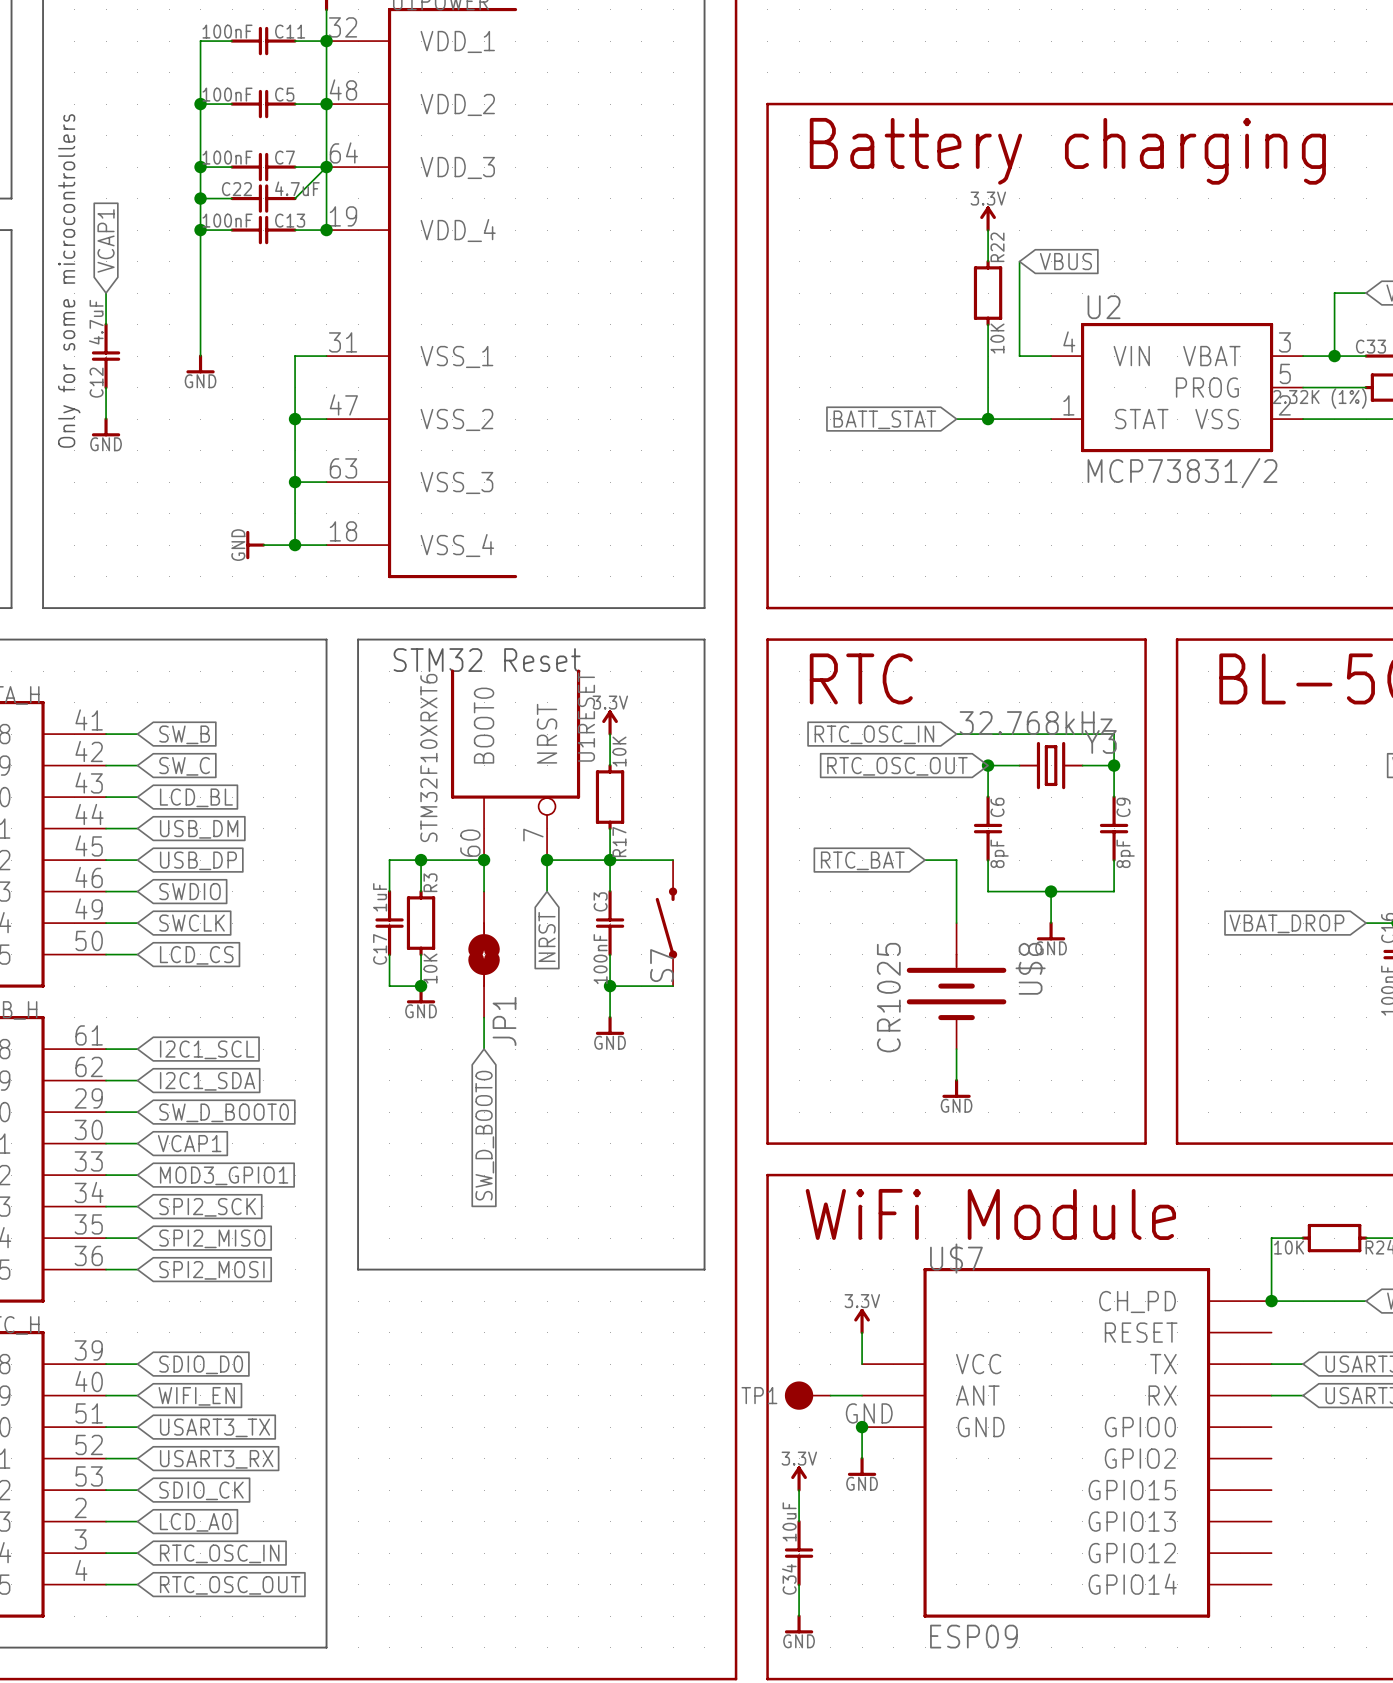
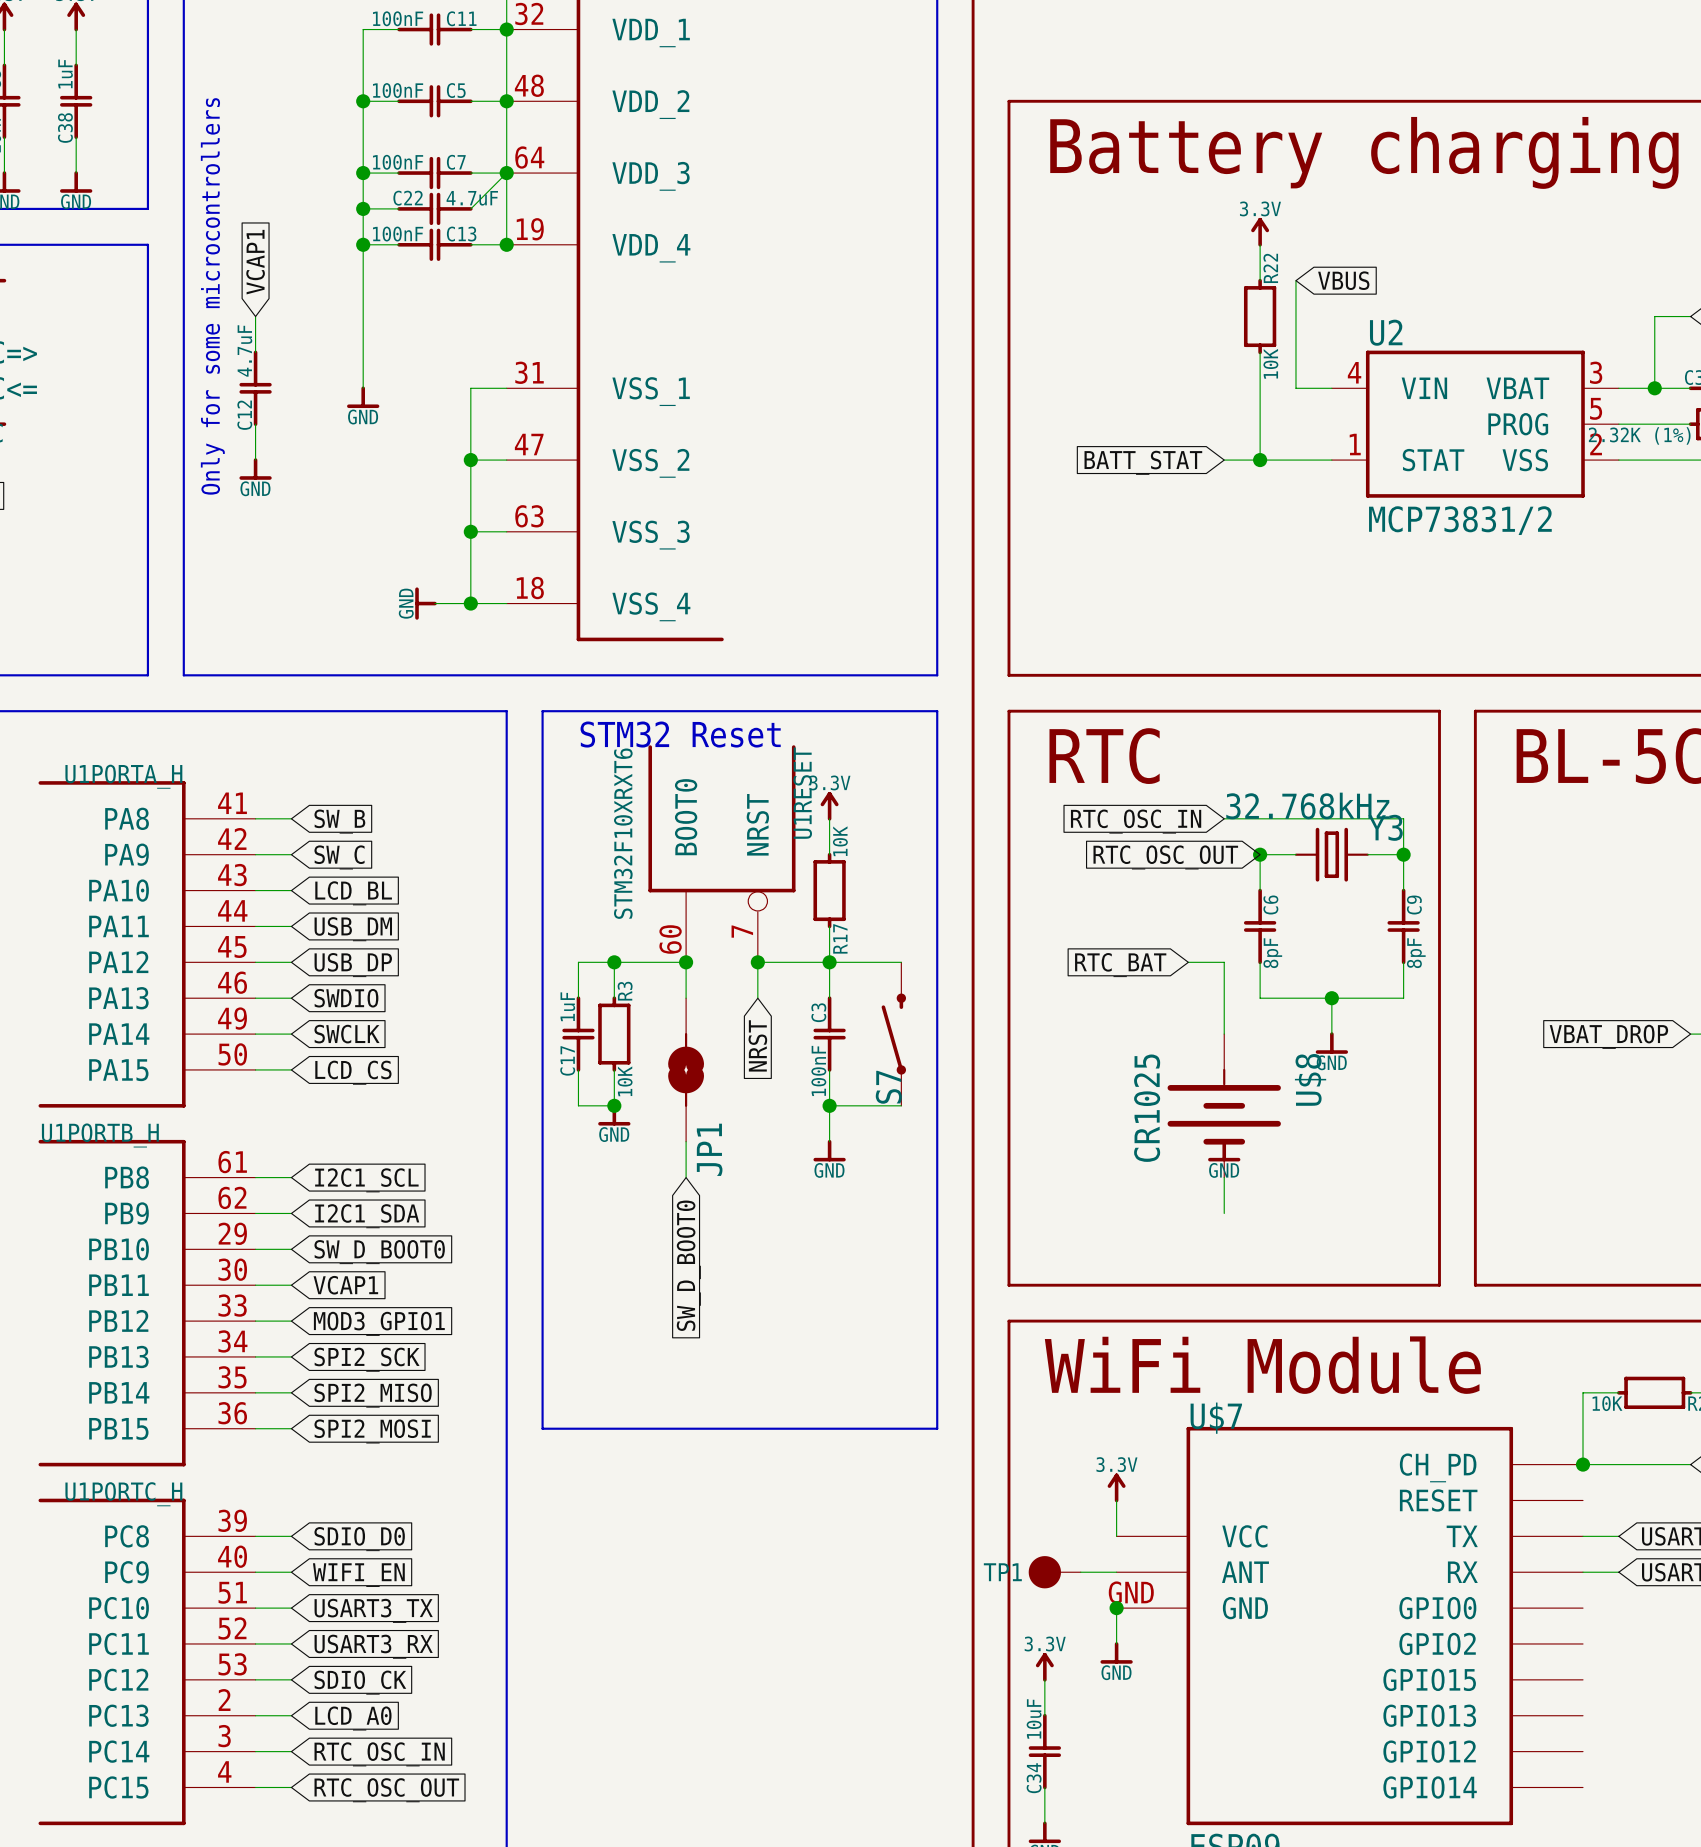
power symbol position: GND (956, 1088) -> GND (1224, 1150)

